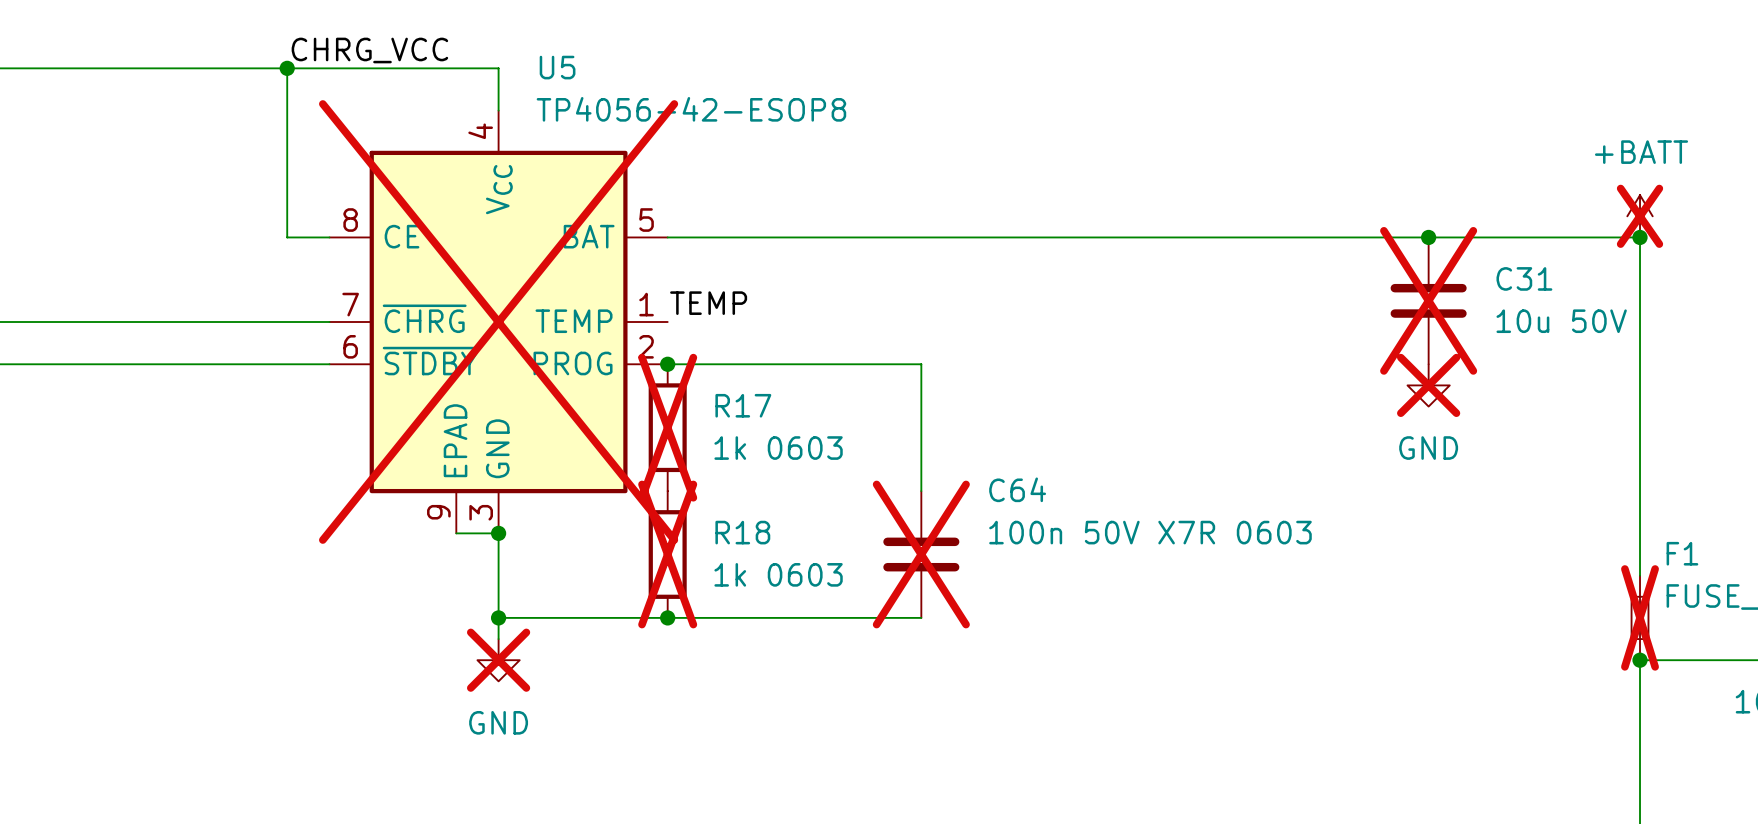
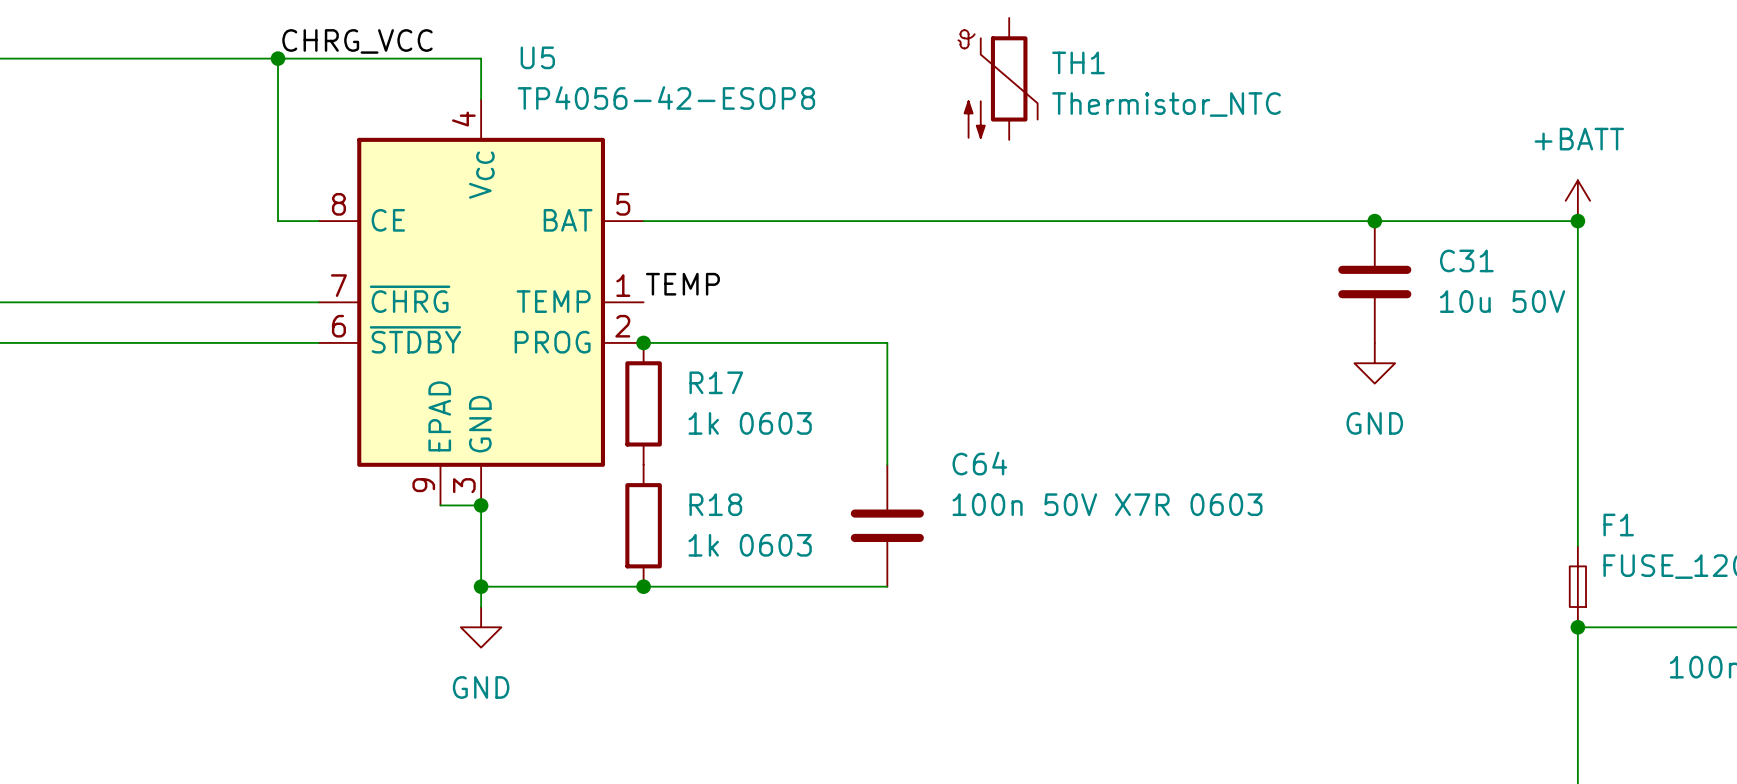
TH1: none -> Thermistor_NTC (998, 78)
power symbol do-not-place cross: (1640, 216) -> none
C31 do-not-place cross: (1428, 300) -> none
U5 do-not-place cross: (498, 322) -> none
power symbol do-not-place cross: (1428, 385) -> none
R17 do-not-place cross: (667, 427) -> none
R18 do-not-place cross: (667, 554) -> none
C64 do-not-place cross: (921, 554) -> none
F1 do-not-place cross: (1640, 617) -> none
power symbol do-not-place cross: (498, 660) -> none

